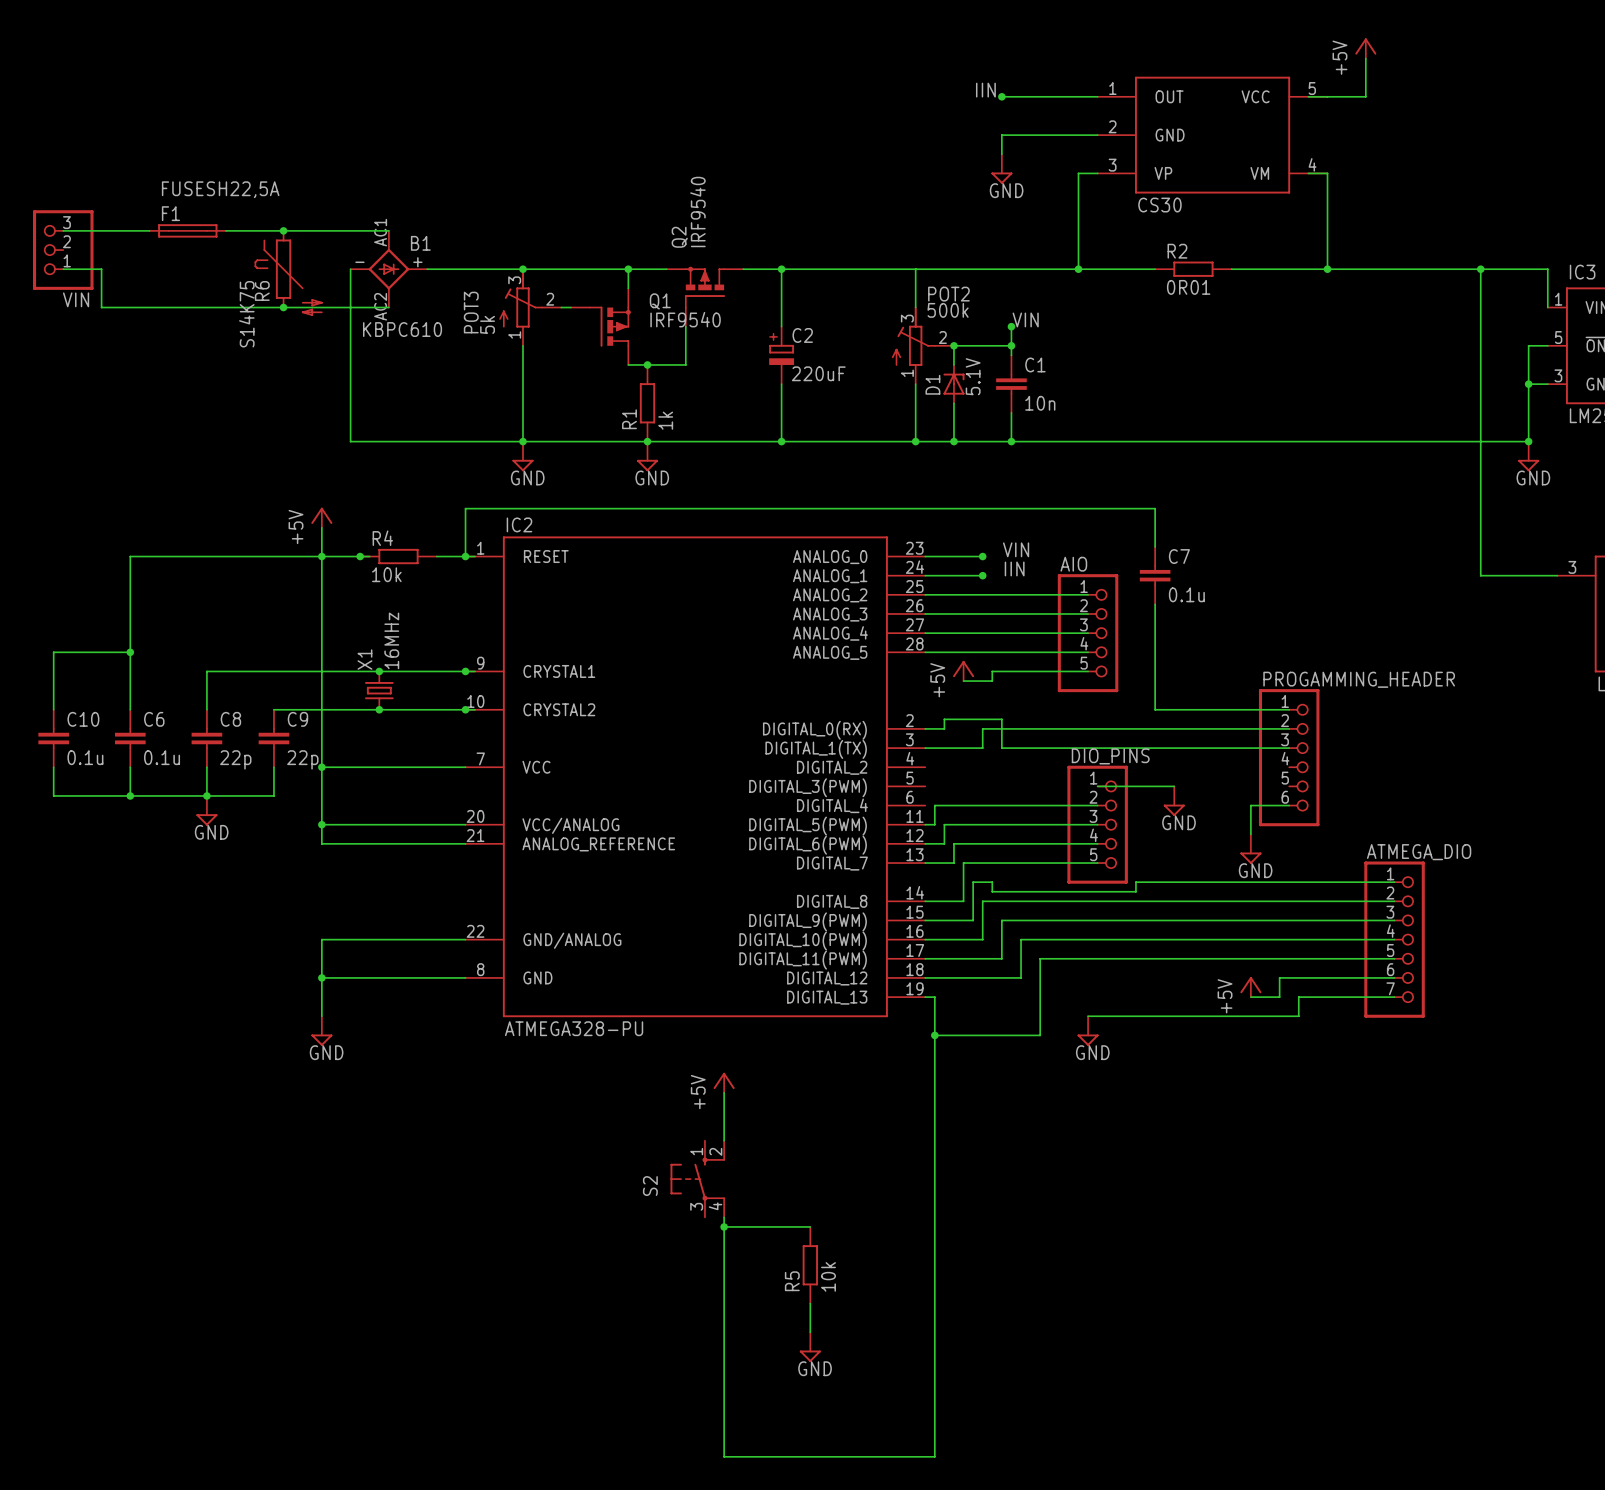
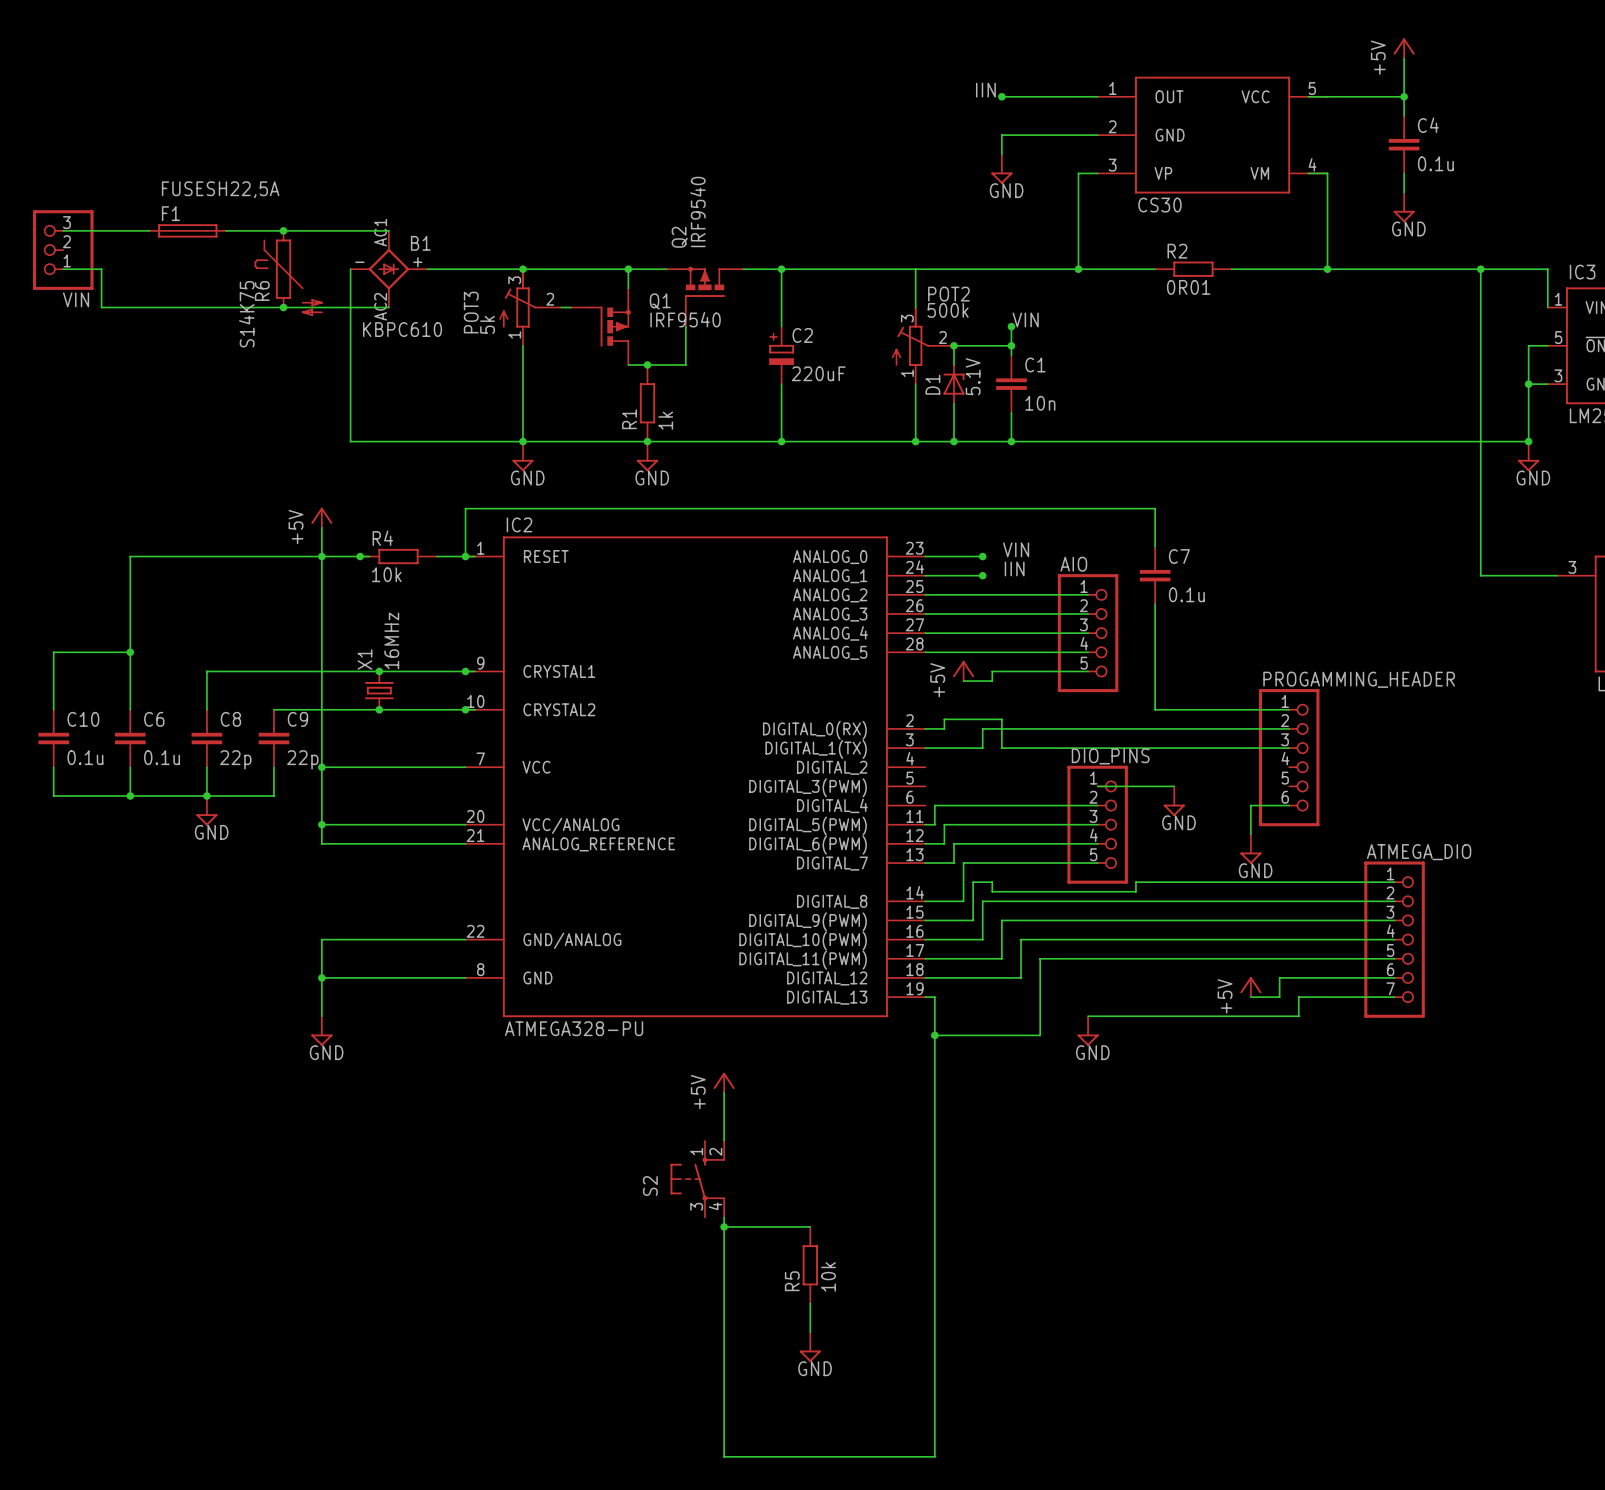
power symbol position: +5V (1365, 48) -> +5V (1404, 48)
wire: (1365, 58) (1365, 96) -> (1404, 96) (1365, 96)
wire: none -> (1404, 58) (1404, 115)
junction: none -> (1404, 96)
C4: none -> 0.1u (1404, 144)
wire: none -> (1404, 173) (1404, 192)
power symbol: none -> GND (1404, 207)

